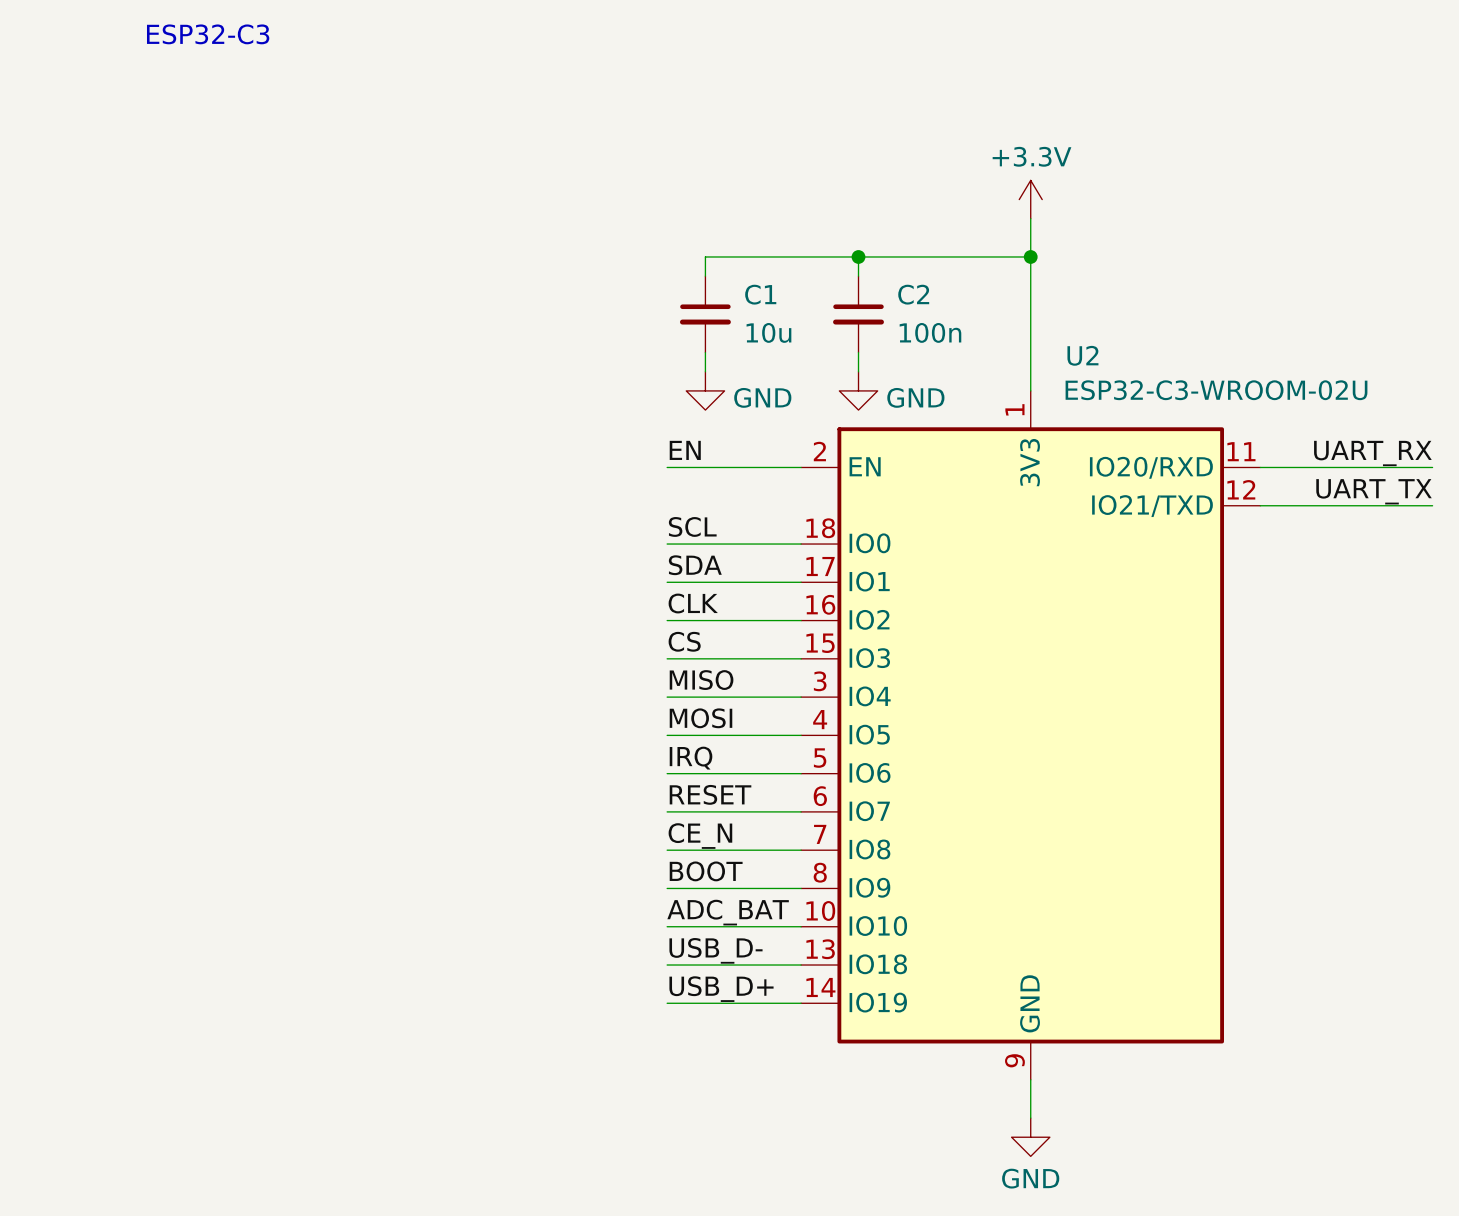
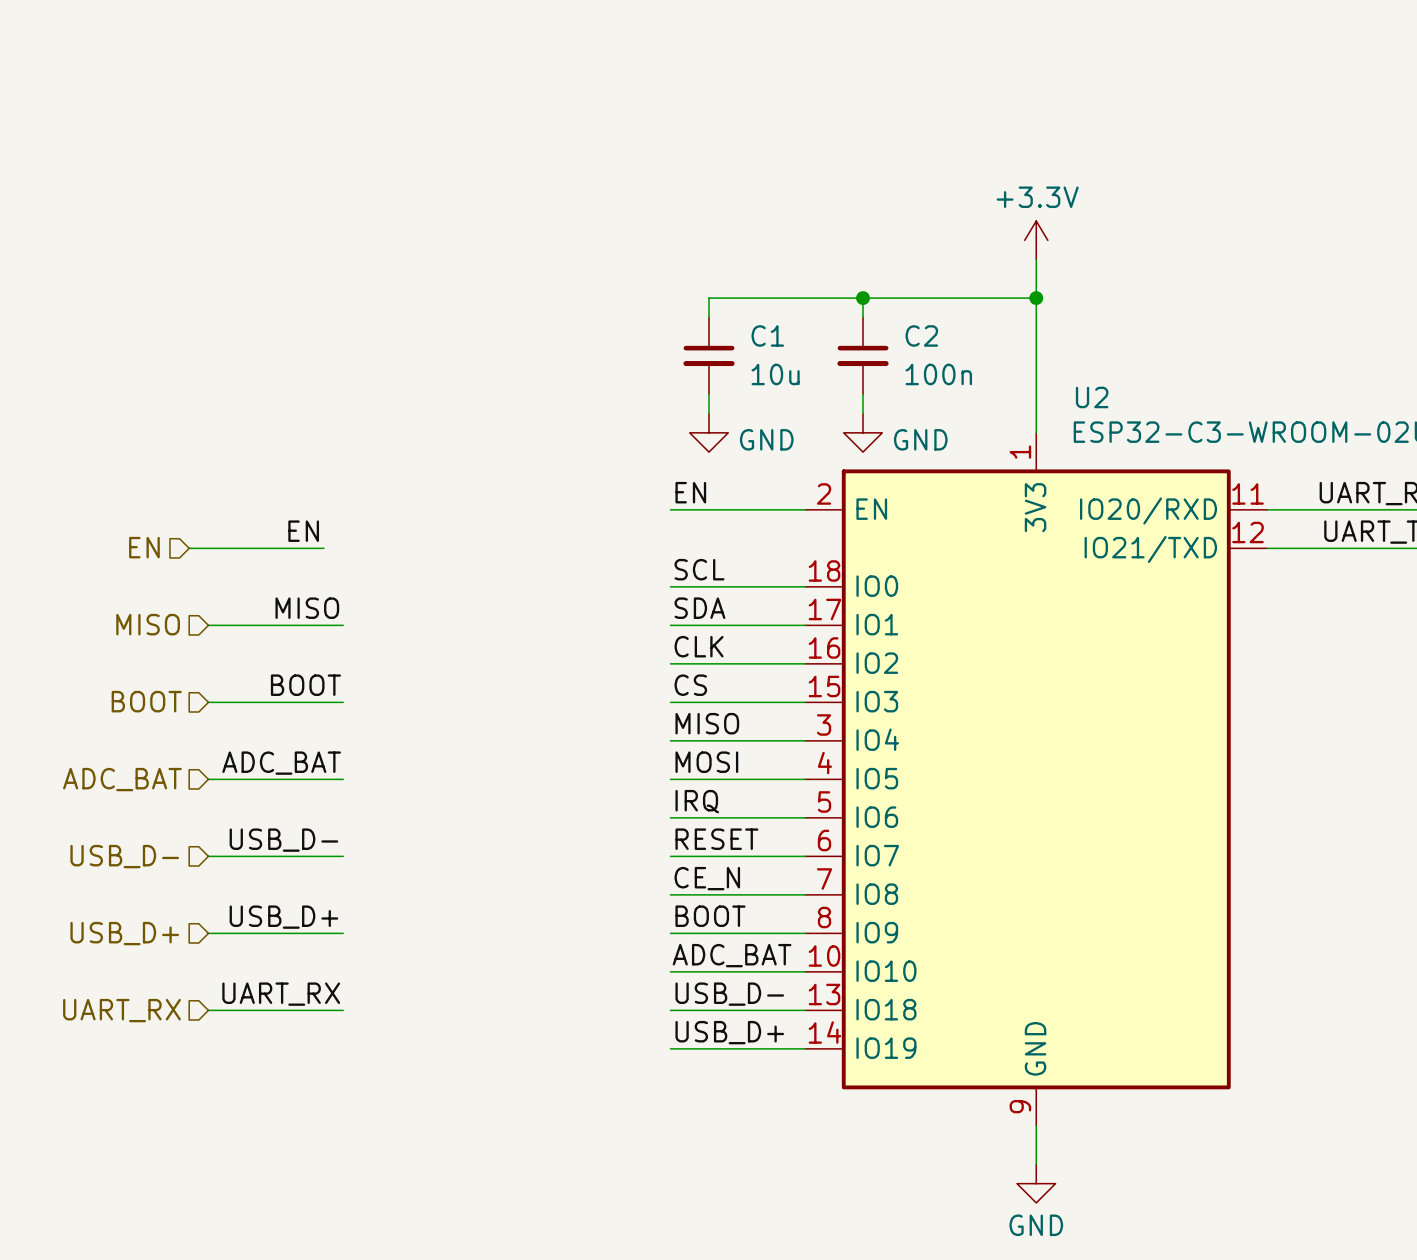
text: ESP32-C3 (208, 34) -> none
label: none -> EN (303, 531)
hierarchical label: none -> EN (144, 547)
wire: none -> (189, 548) (323, 548)
label: none -> MISO (307, 608)
hierarchical label: none -> MISO (148, 624)
wire: none -> (208, 625) (343, 625)
label: none -> BOOT (305, 685)
hierarchical label: none -> BOOT (146, 701)
wire: none -> (208, 702) (343, 702)
label: none -> ADC_BAT (281, 763)
wire: none -> (208, 779) (343, 779)
hierarchical label: none -> ADC_BAT (122, 779)
label: none -> USB_D- (283, 840)
wire: none -> (208, 856) (343, 856)
hierarchical label: none -> USB_D- (124, 856)
label: none -> USB_D+ (283, 917)
wire: none -> (208, 933) (343, 933)
hierarchical label: none -> USB_D+ (124, 933)
label: none -> UART_RX (281, 994)
wire: none -> (208, 1010) (343, 1010)
hierarchical label: none -> UART_RX (121, 1010)

